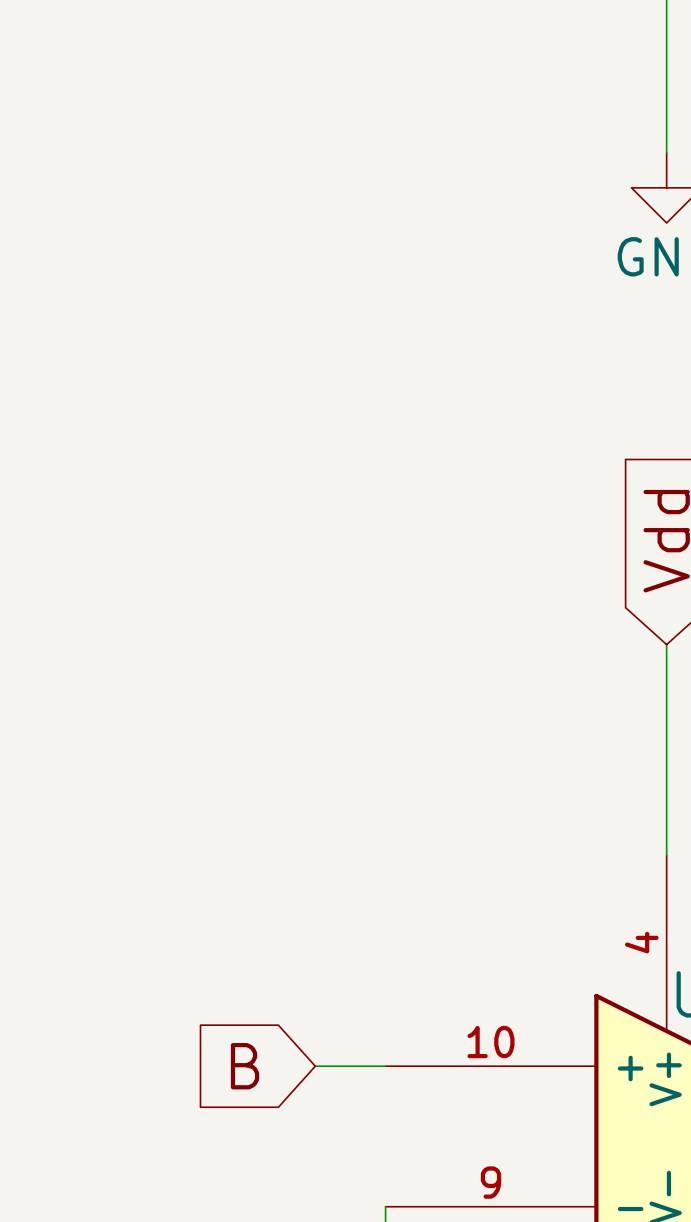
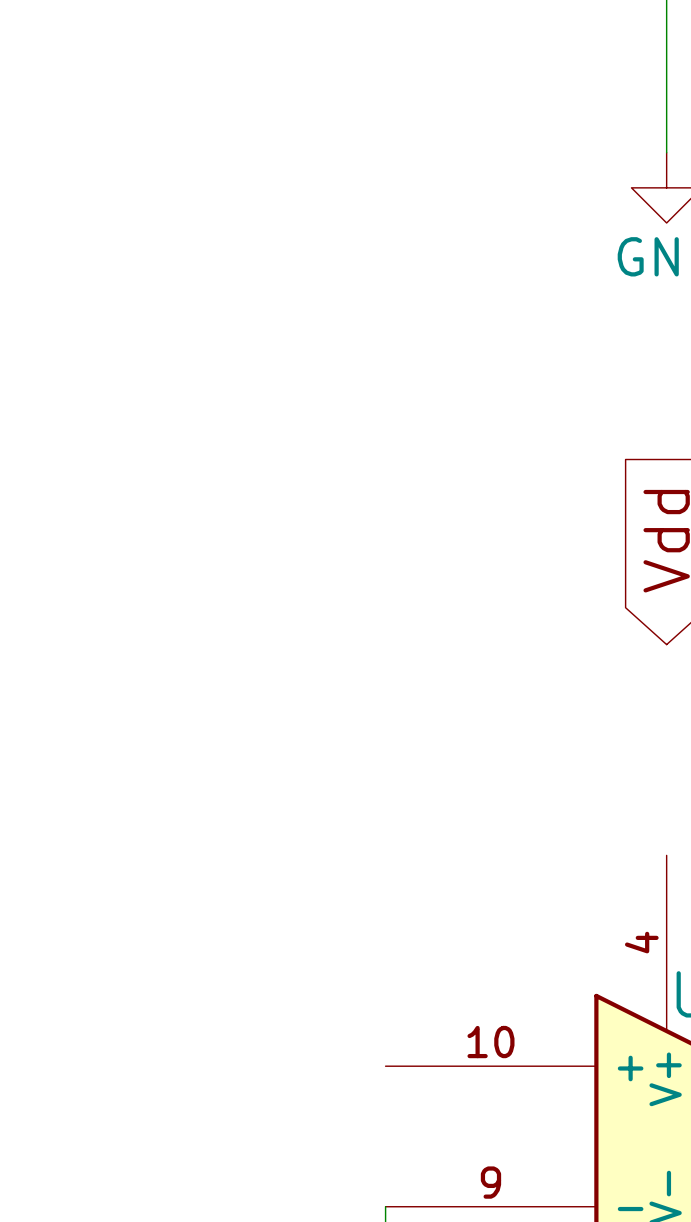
wire: (666, 644) (666, 855) -> none
global label: B (245, 1066) -> none
wire: (315, 1066) (385, 1066) -> none

